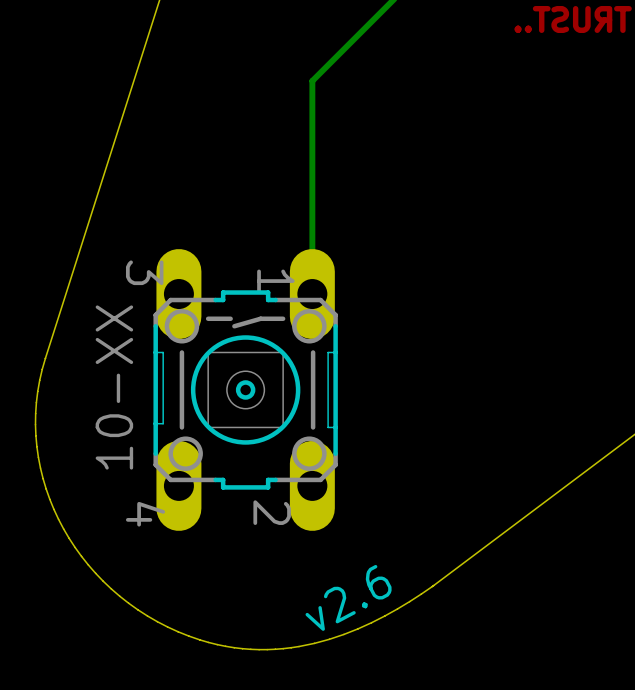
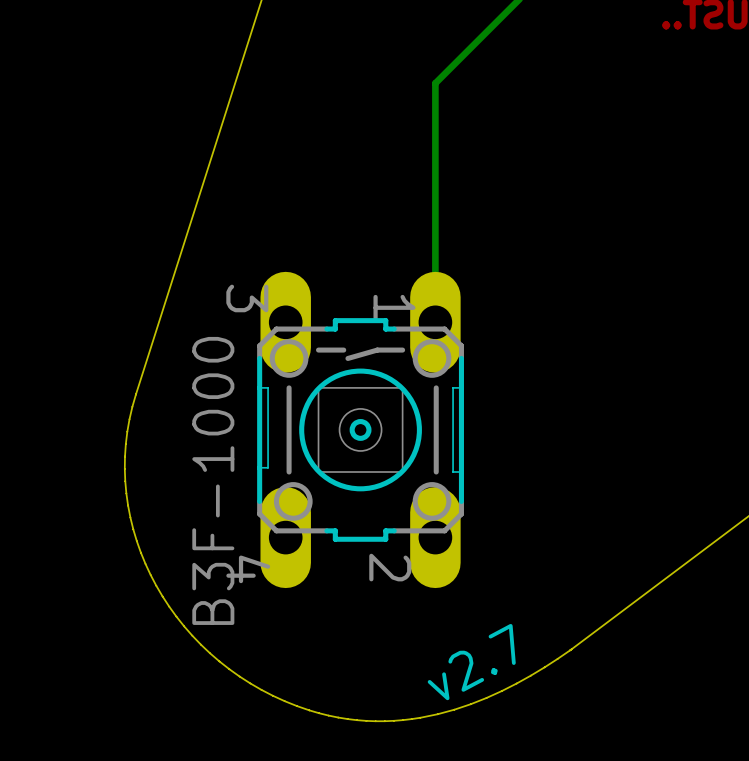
part value: 10-XX (114, 387) -> B3F-1000 (213, 480)
text: v2.6 (348, 597) -> v2.7 (471, 662)

